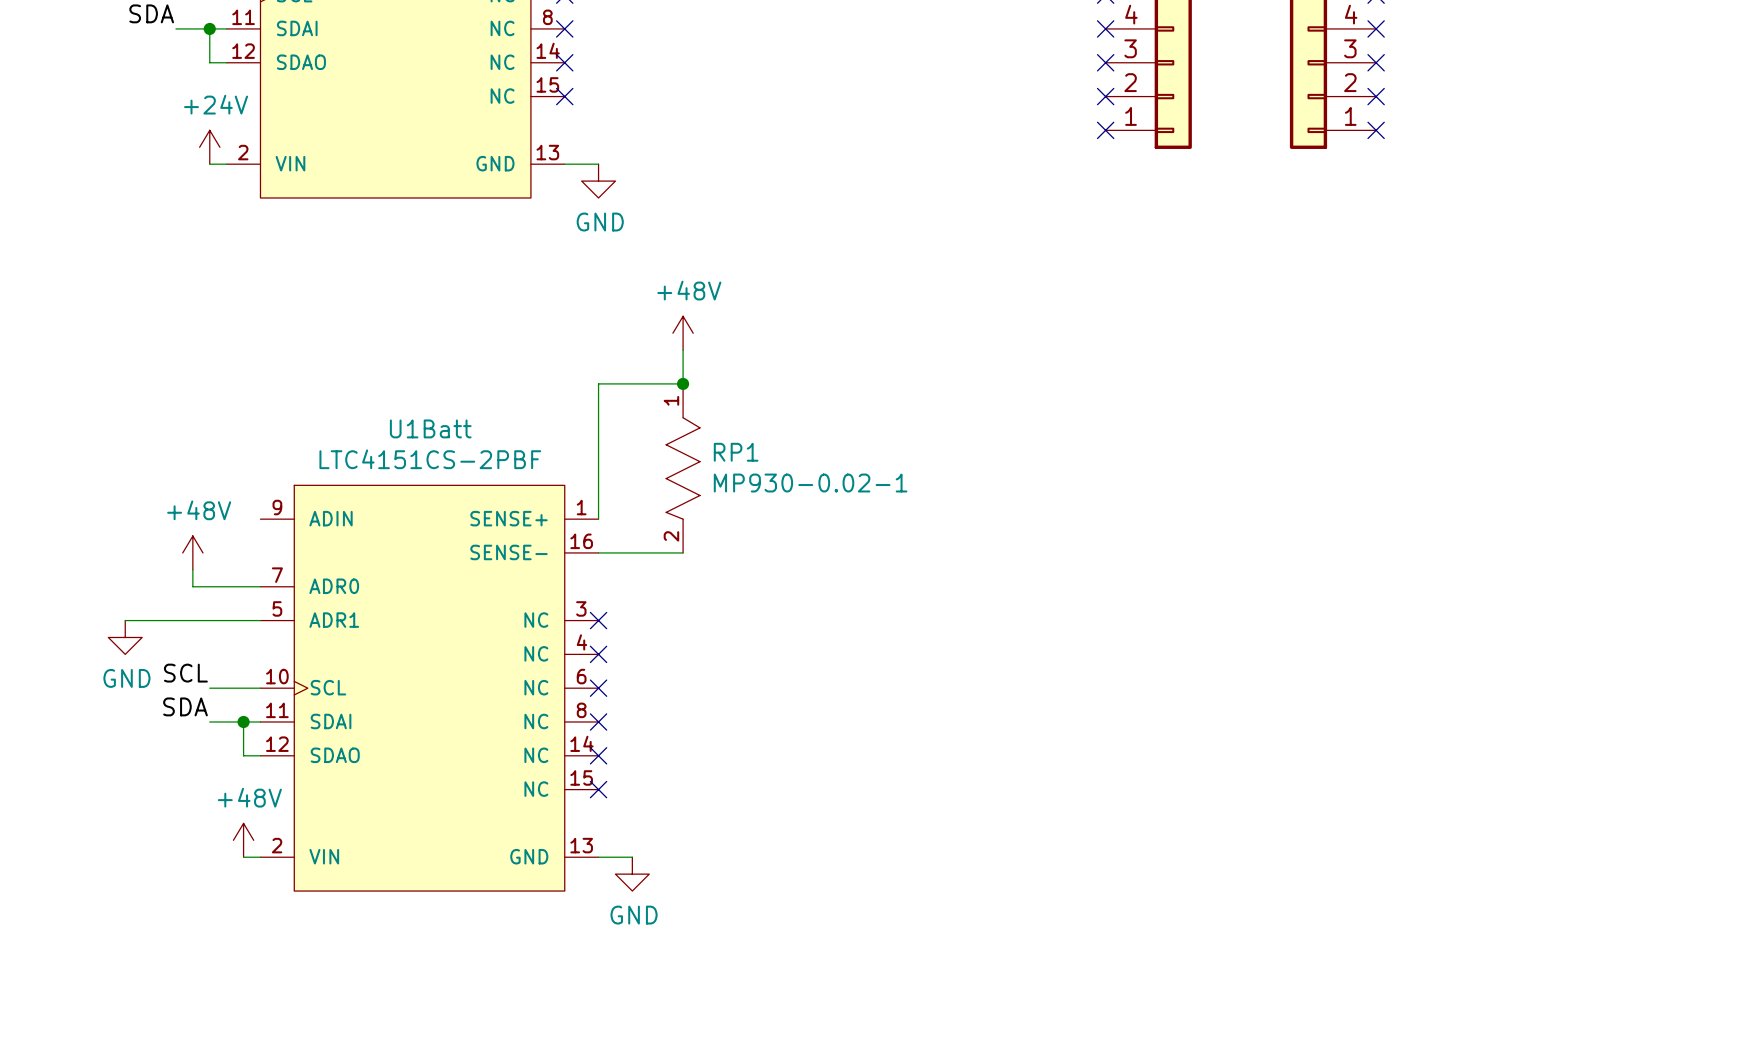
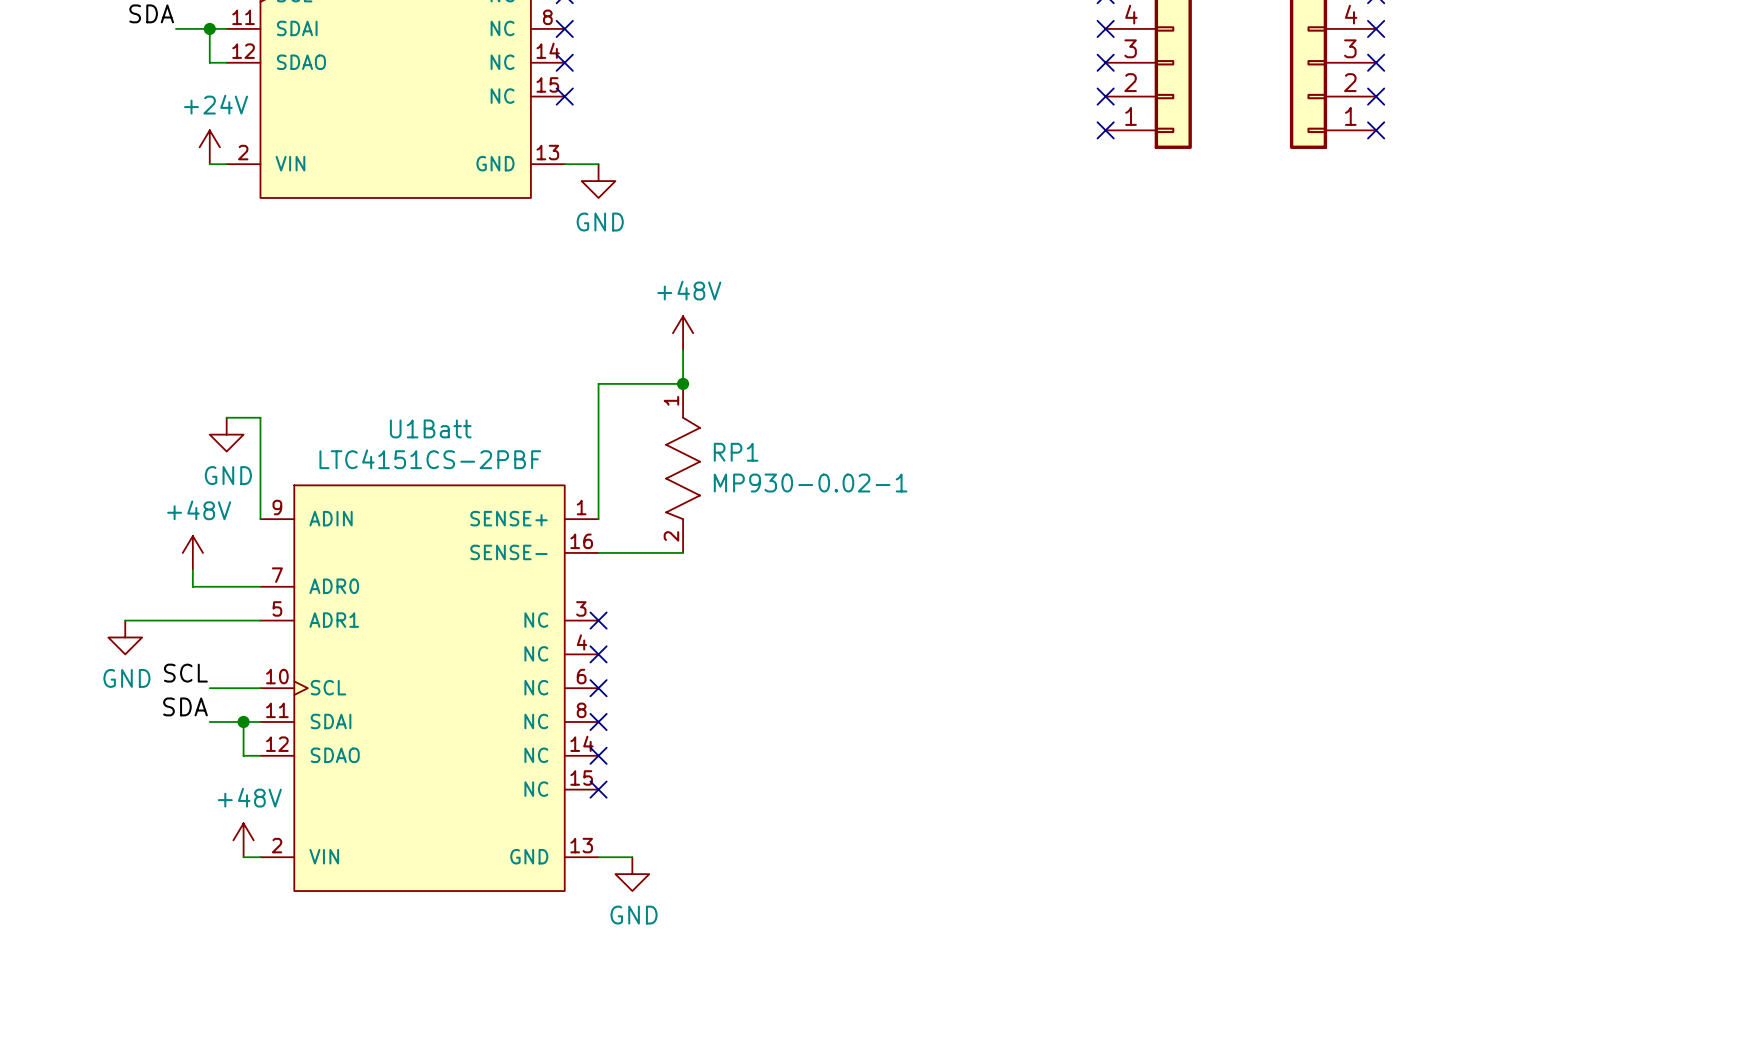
wire: none -> (226, 417) (260, 417) (260, 519)
power symbol: none -> GND (226, 434)

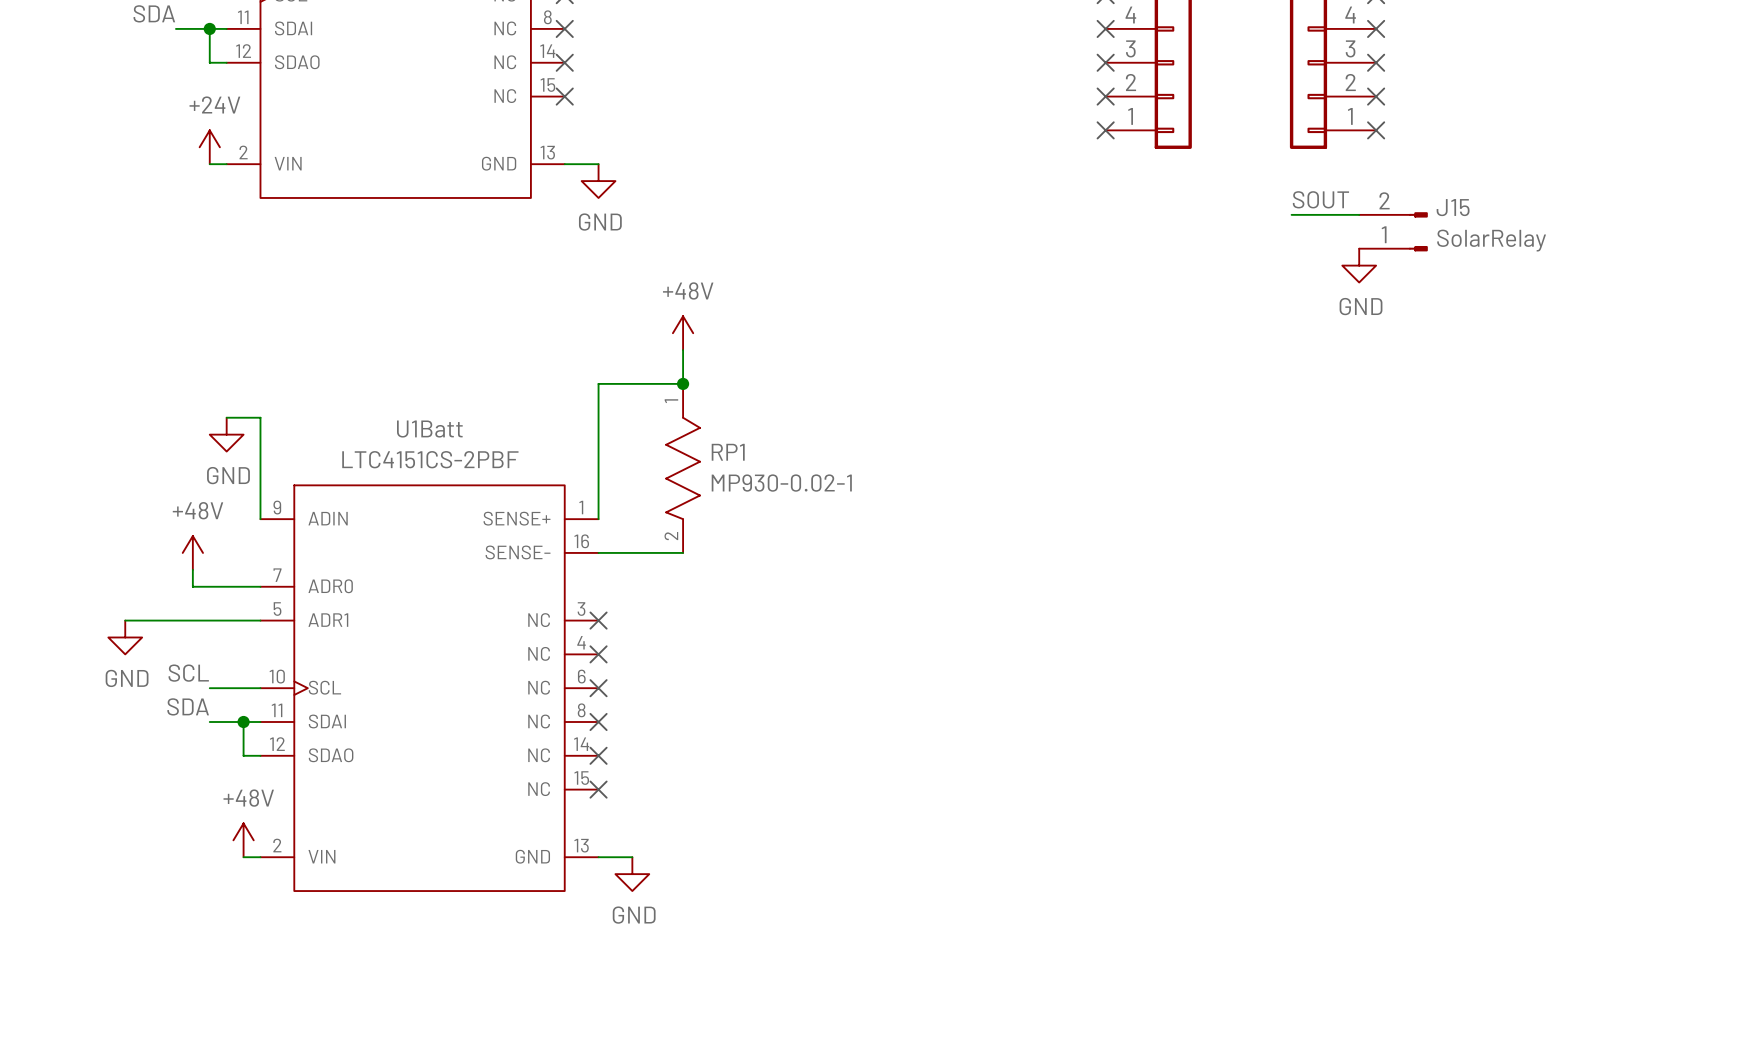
label: none -> SOUT (1320, 199)
wire: none -> (1291, 214) (1359, 214)
J15: none -> SolarRelay (1393, 231)
power symbol: none -> GND (1359, 265)

